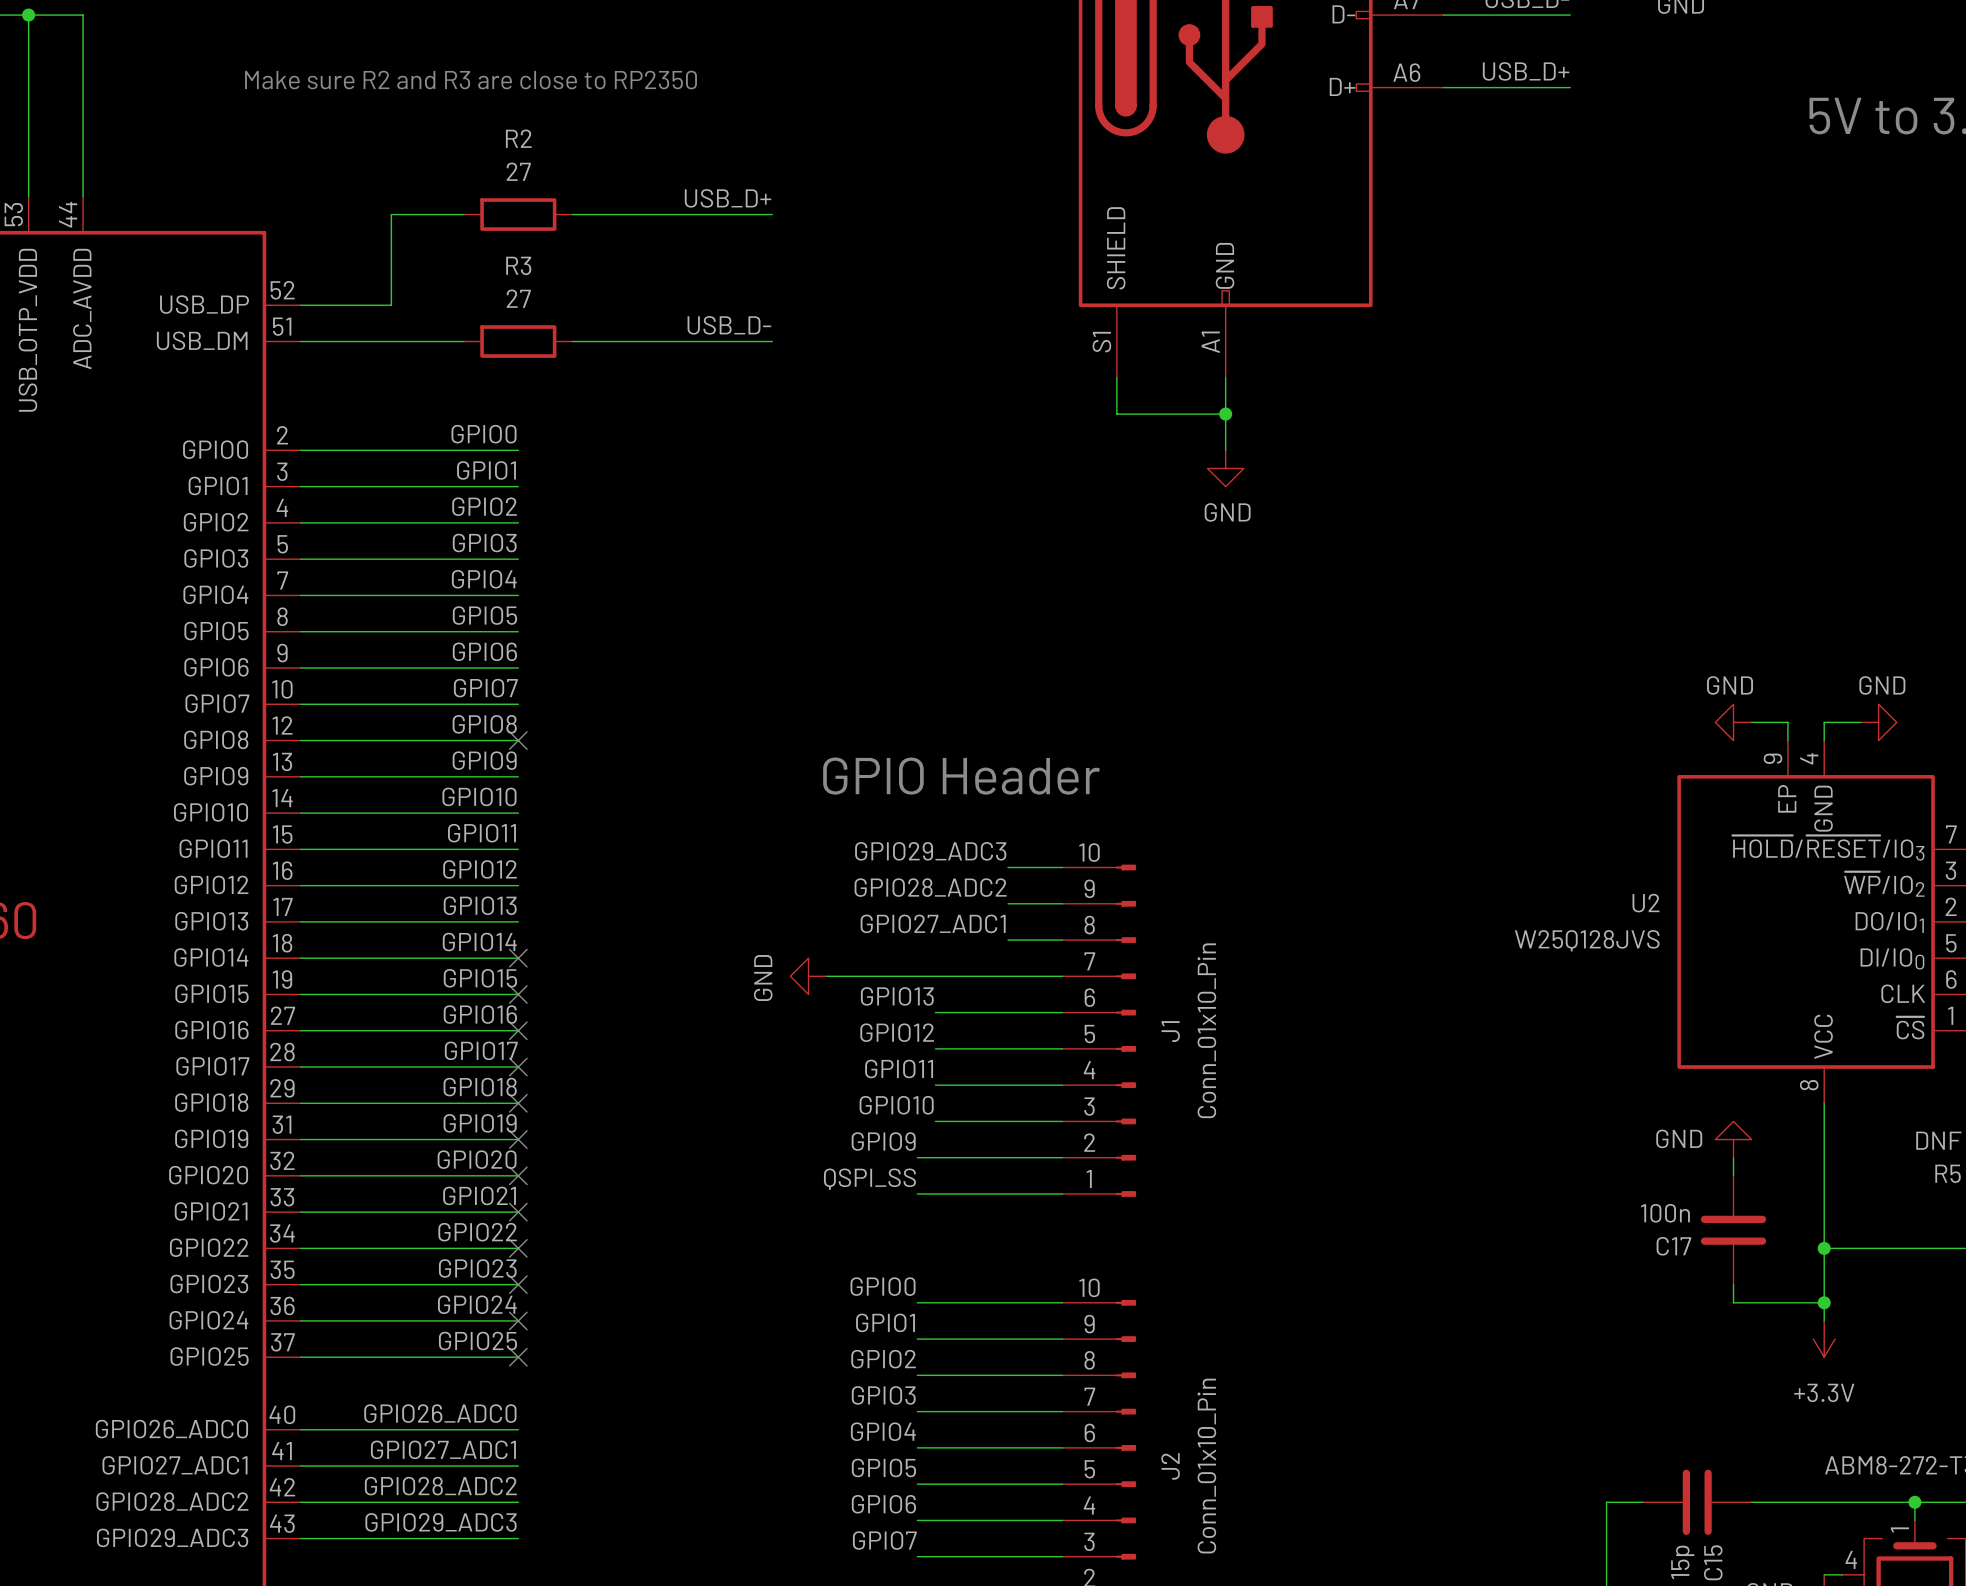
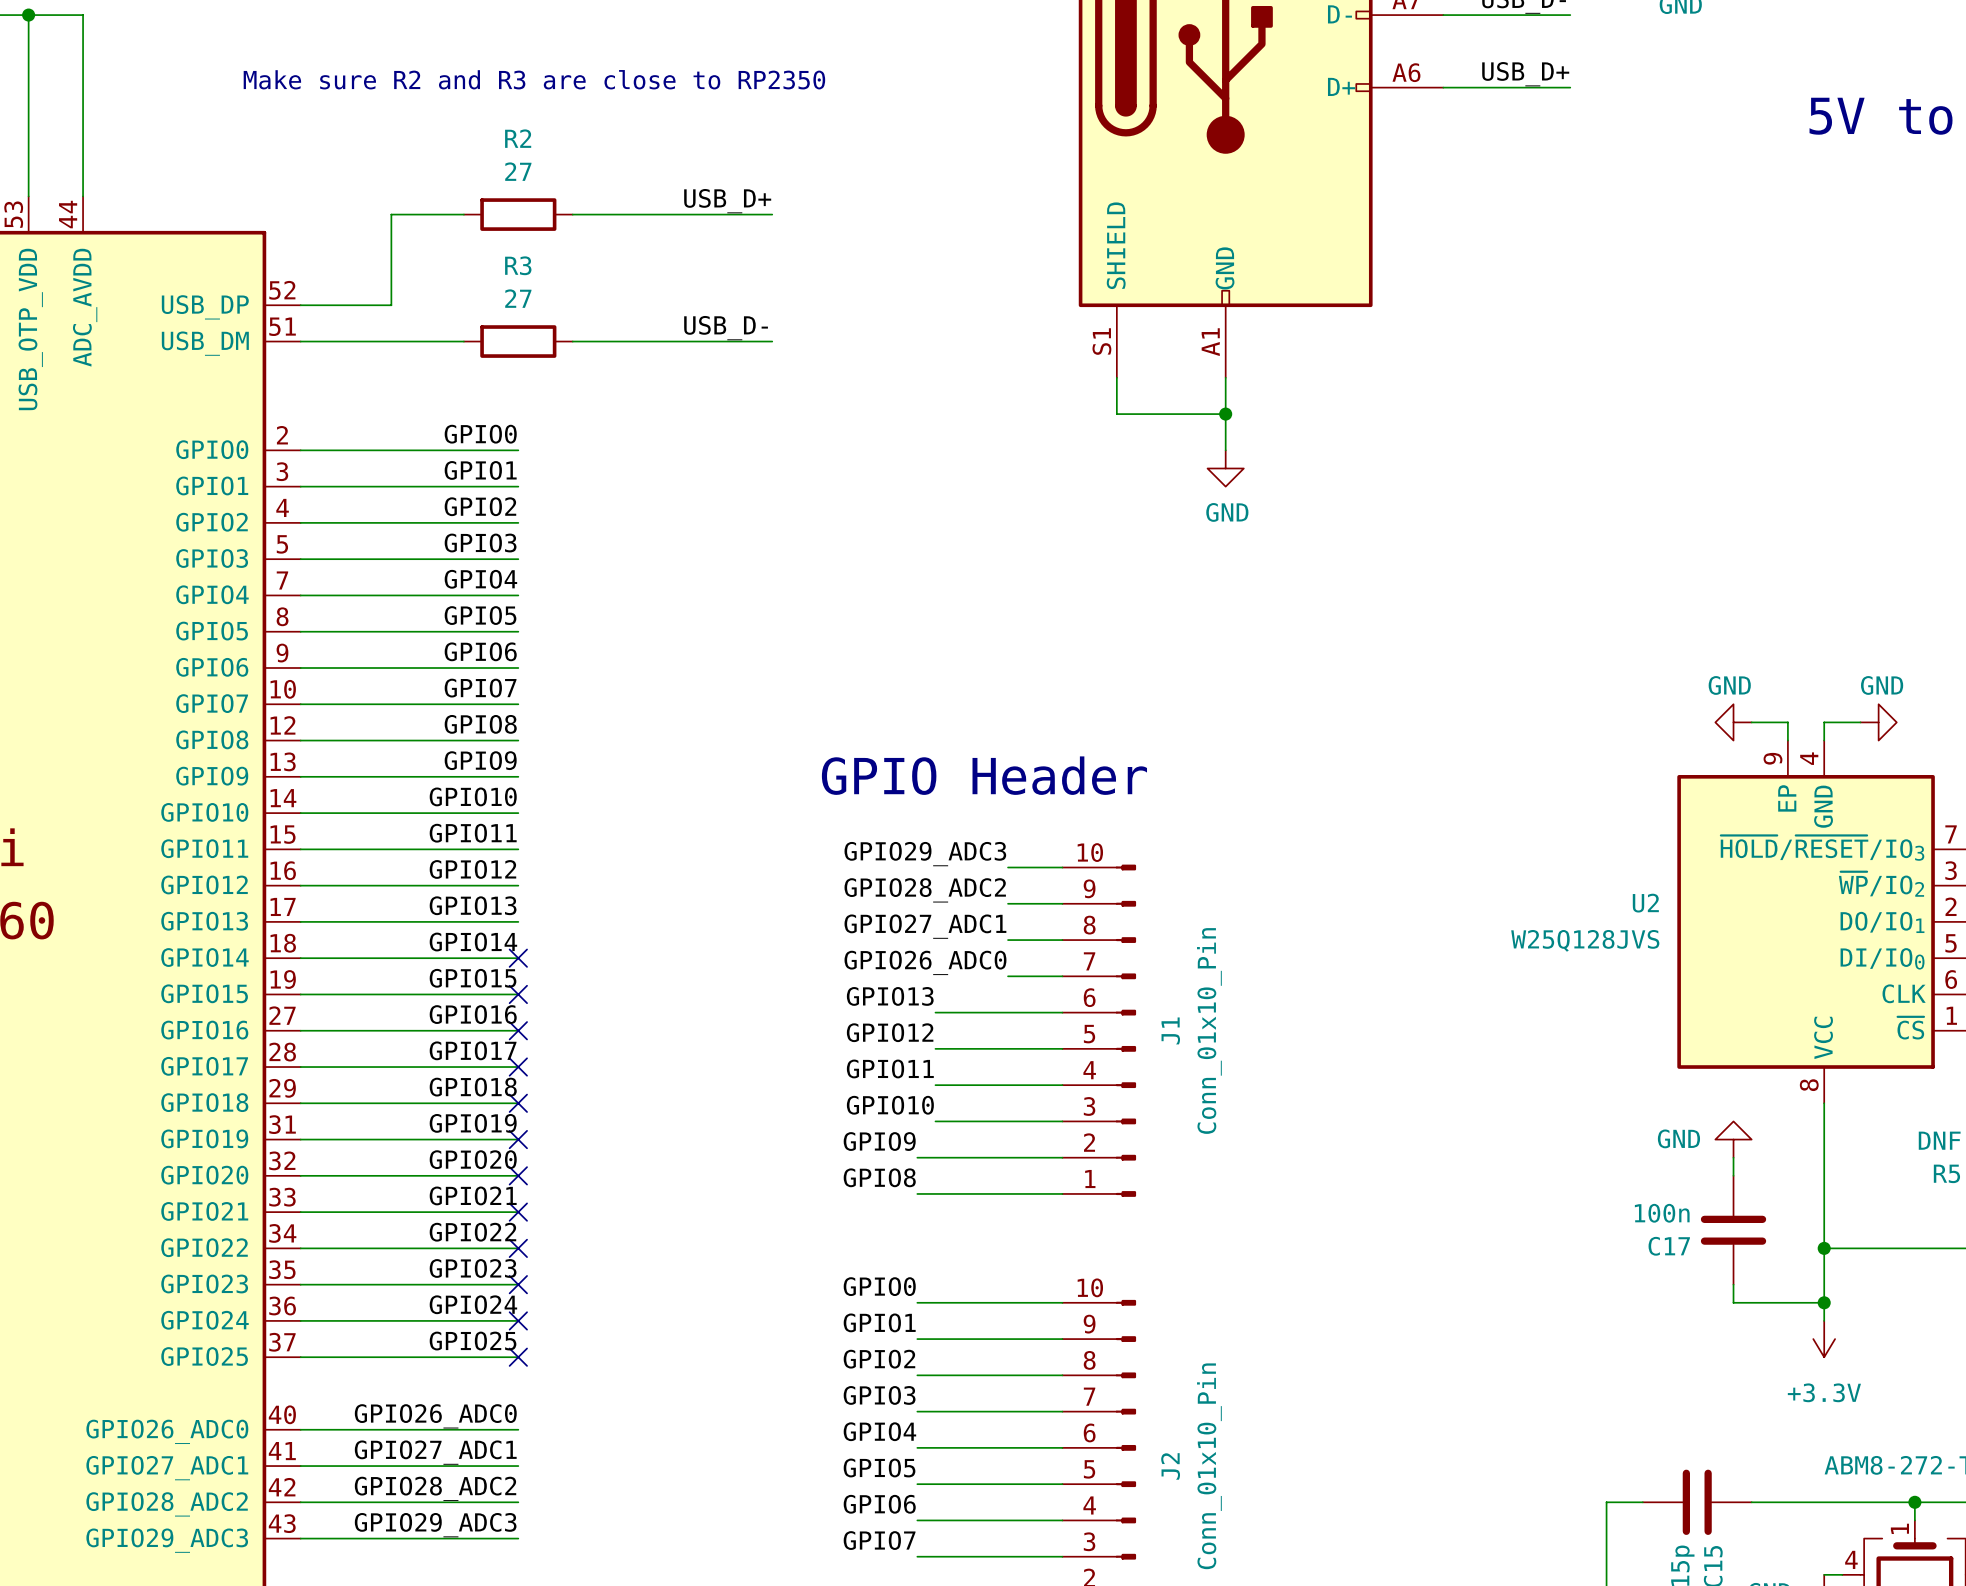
no-connect mark: (518, 740) -> none
label: none -> GPIO26_ADC0 (925, 962)
power symbol: GND (808, 976) -> none
wire: (826, 976) (1008, 976) -> none
label: QSPI_SS (869, 1179) -> GPIO8 (879, 1177)

